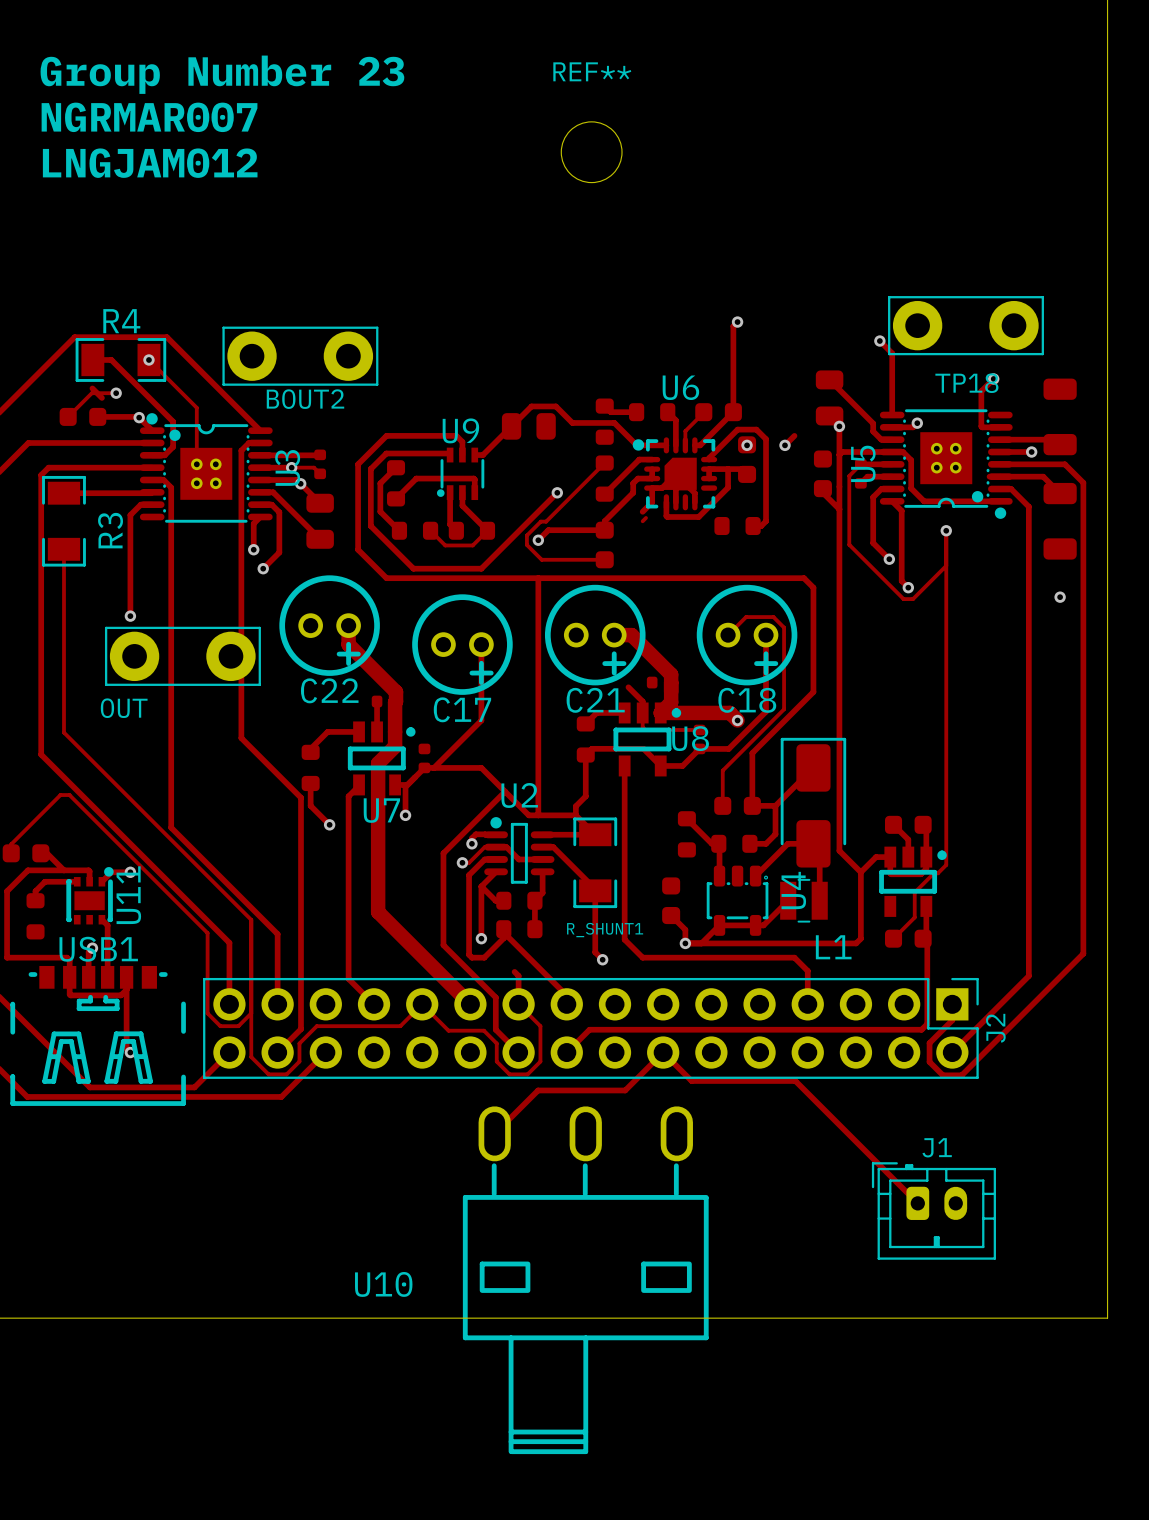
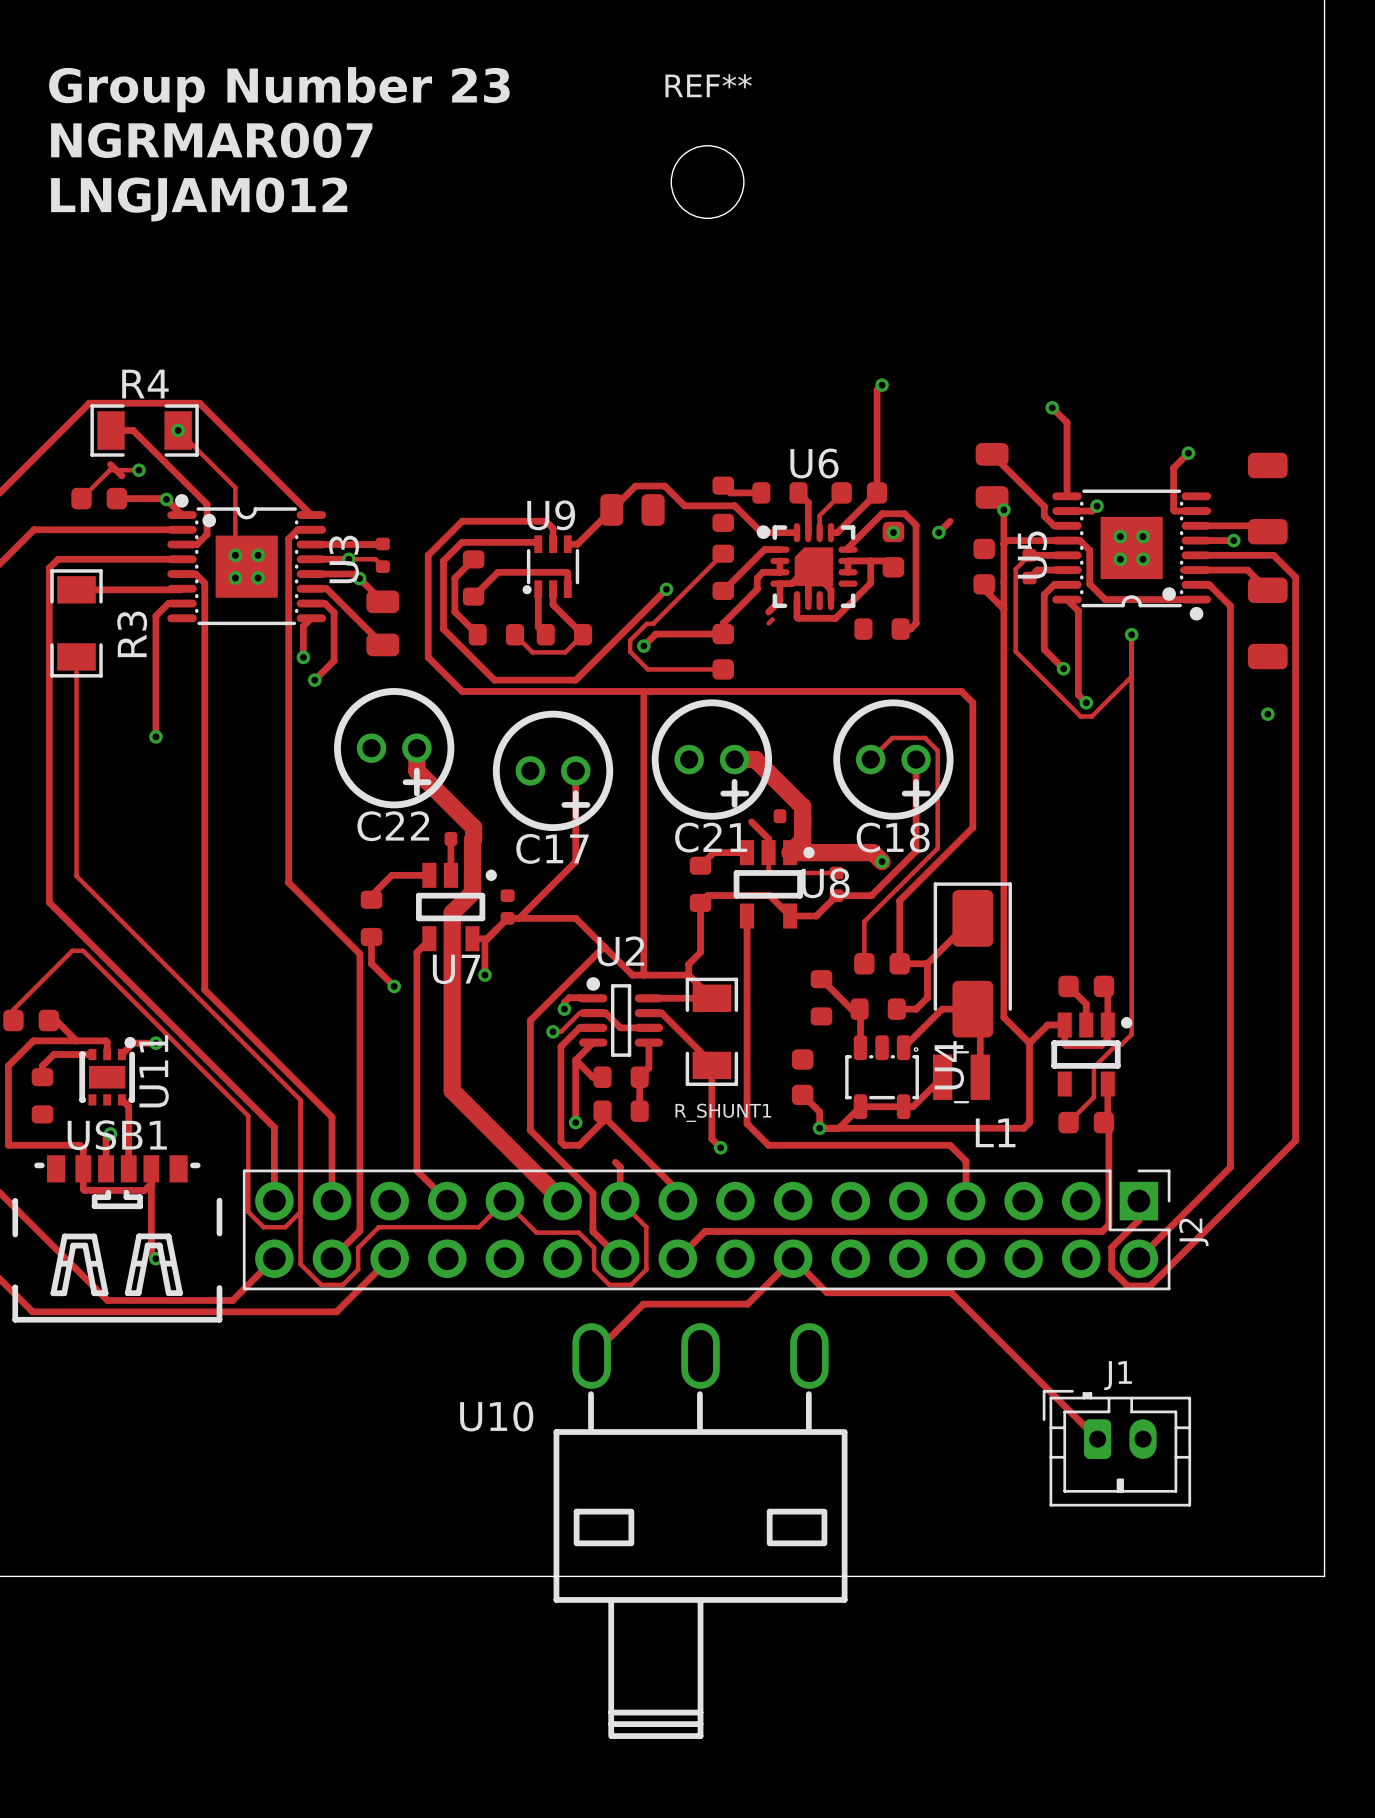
TP18: (966, 325) -> none
BOUT2: (300, 356) -> none
OUT: (182, 656) -> none
U10 name position: U10 (383, 1284) -> U10 (496, 1416)

